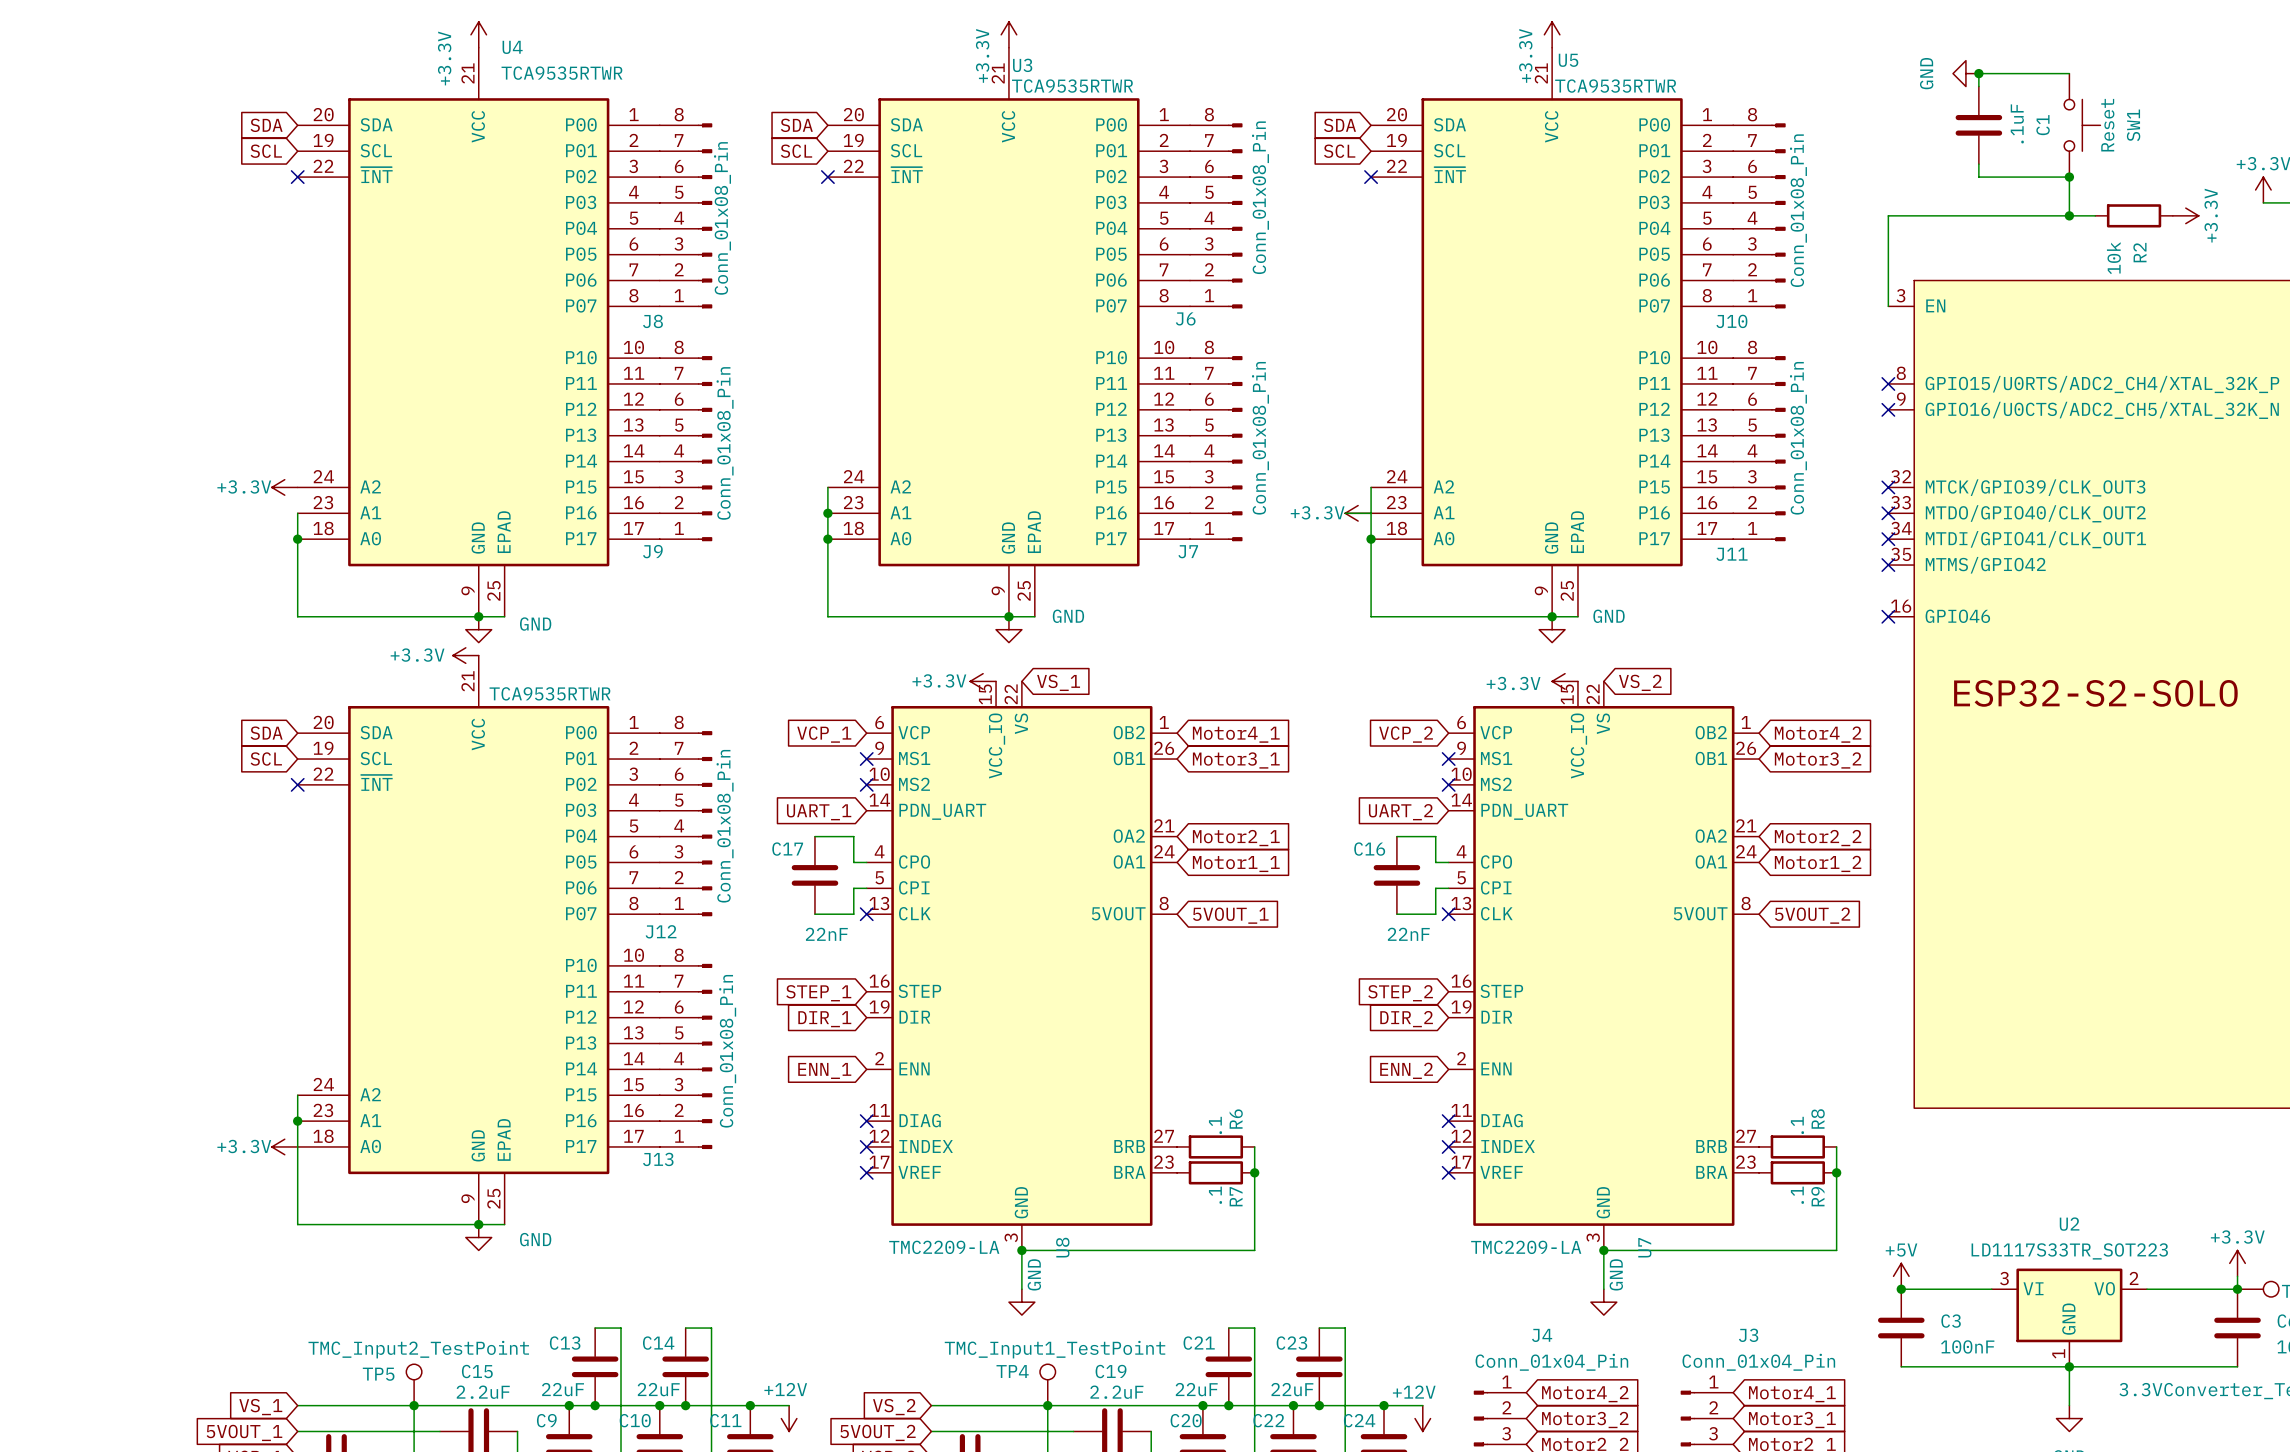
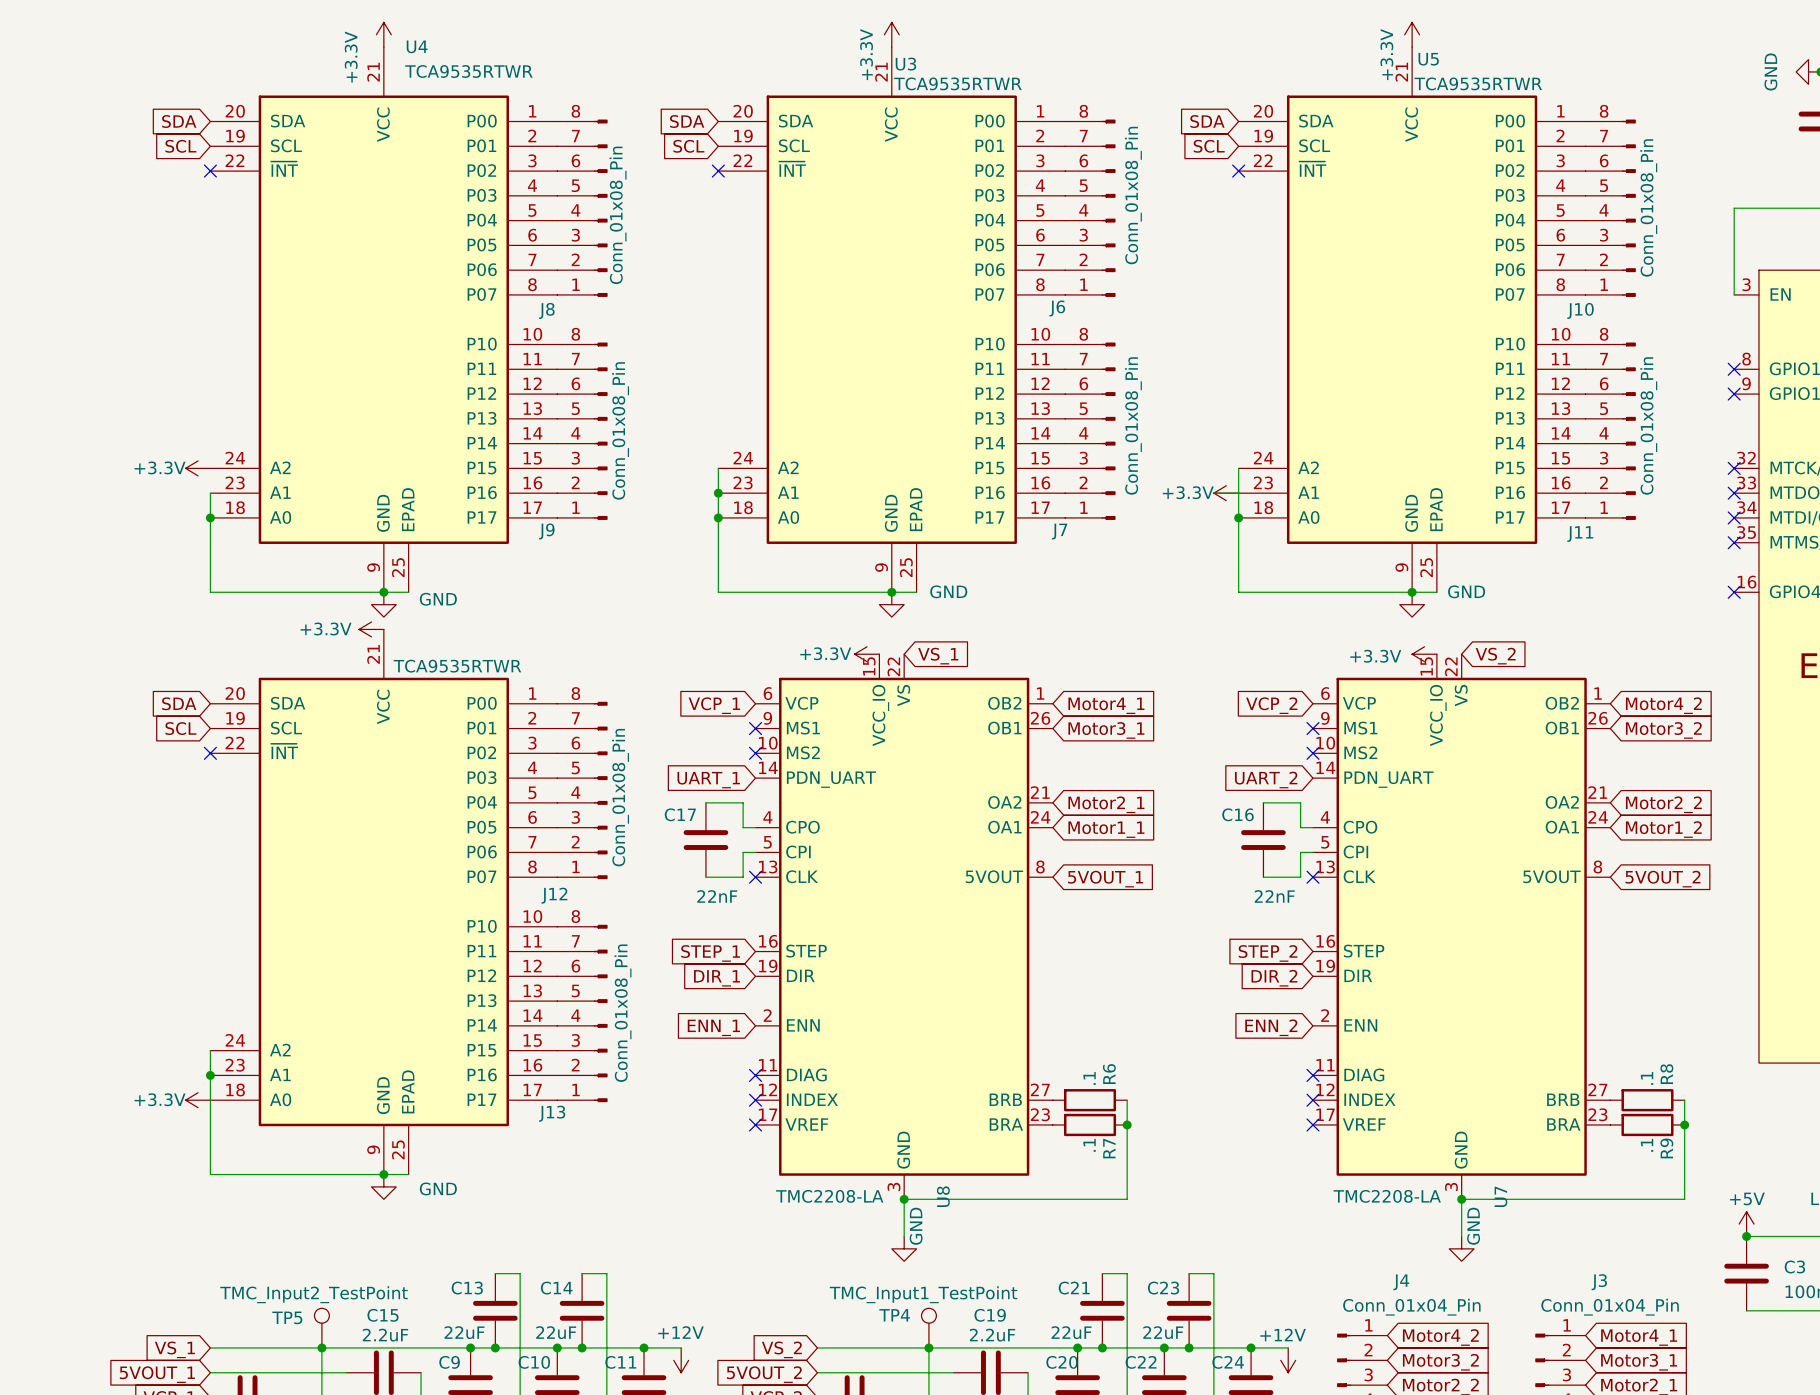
U8 value: TMC2209-LA (944, 1247) -> TMC2208-LA (829, 1196)
U7 value: TMC2209-LA (1526, 1247) -> TMC2208-LA (1387, 1196)

